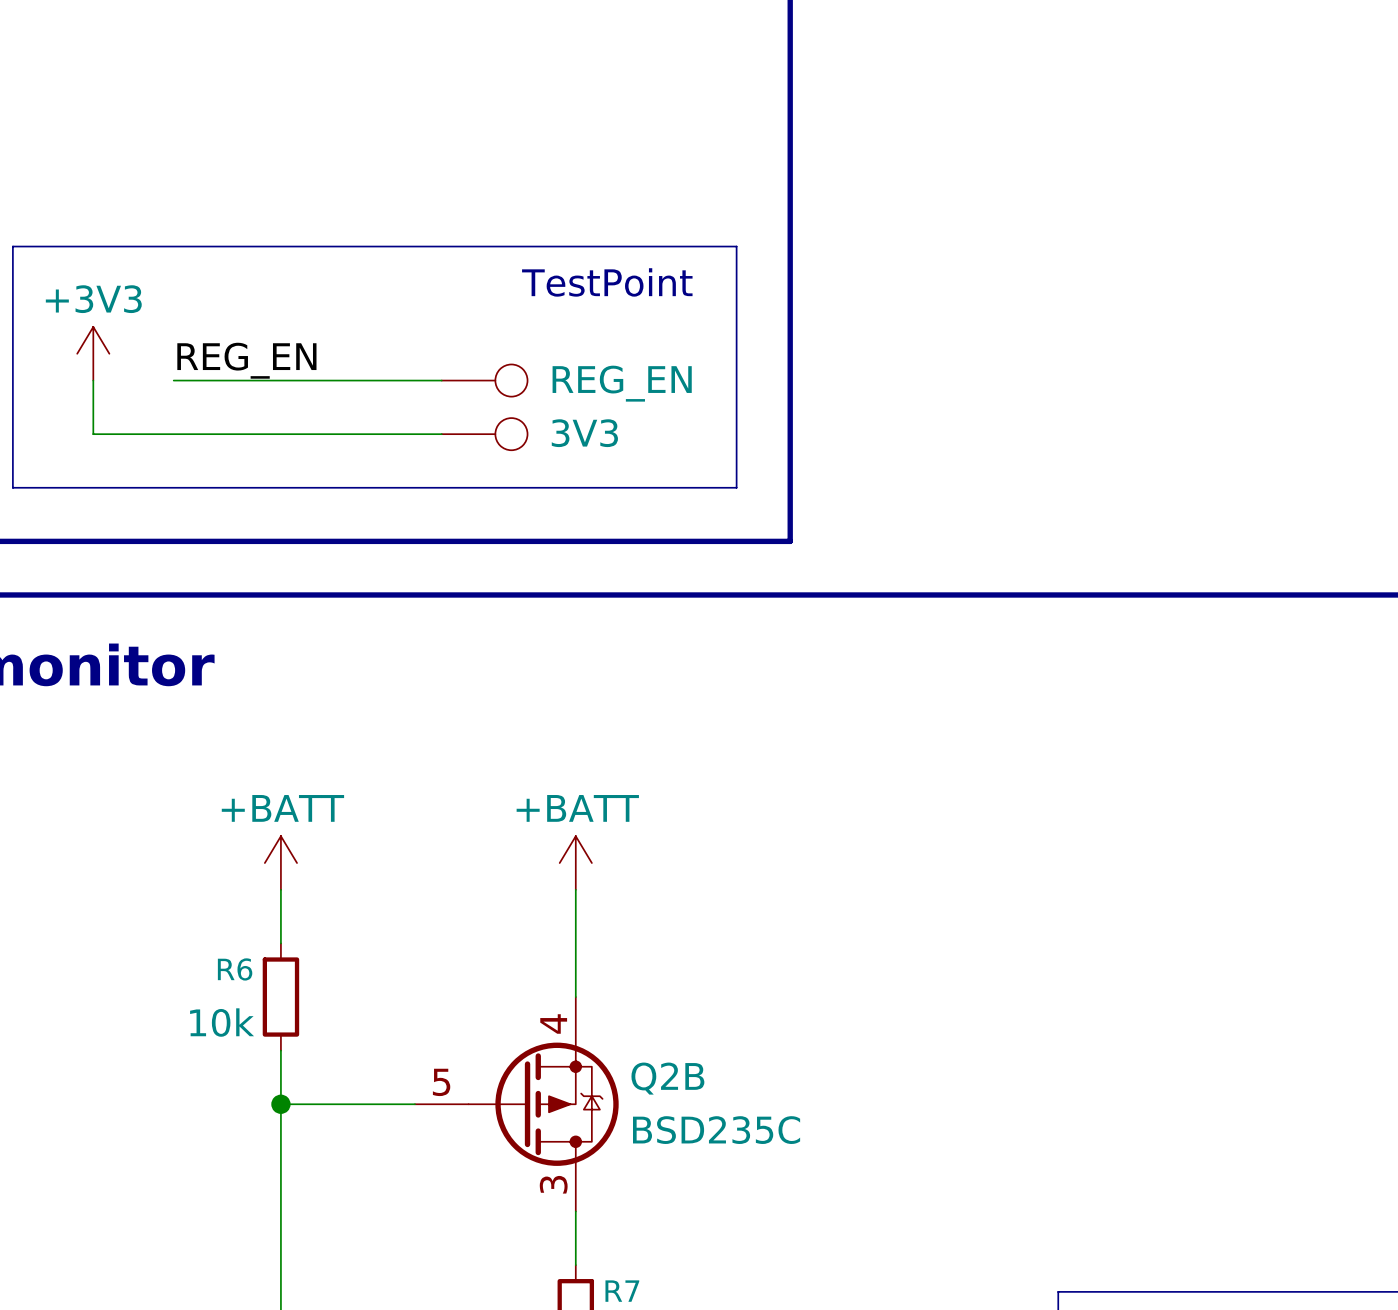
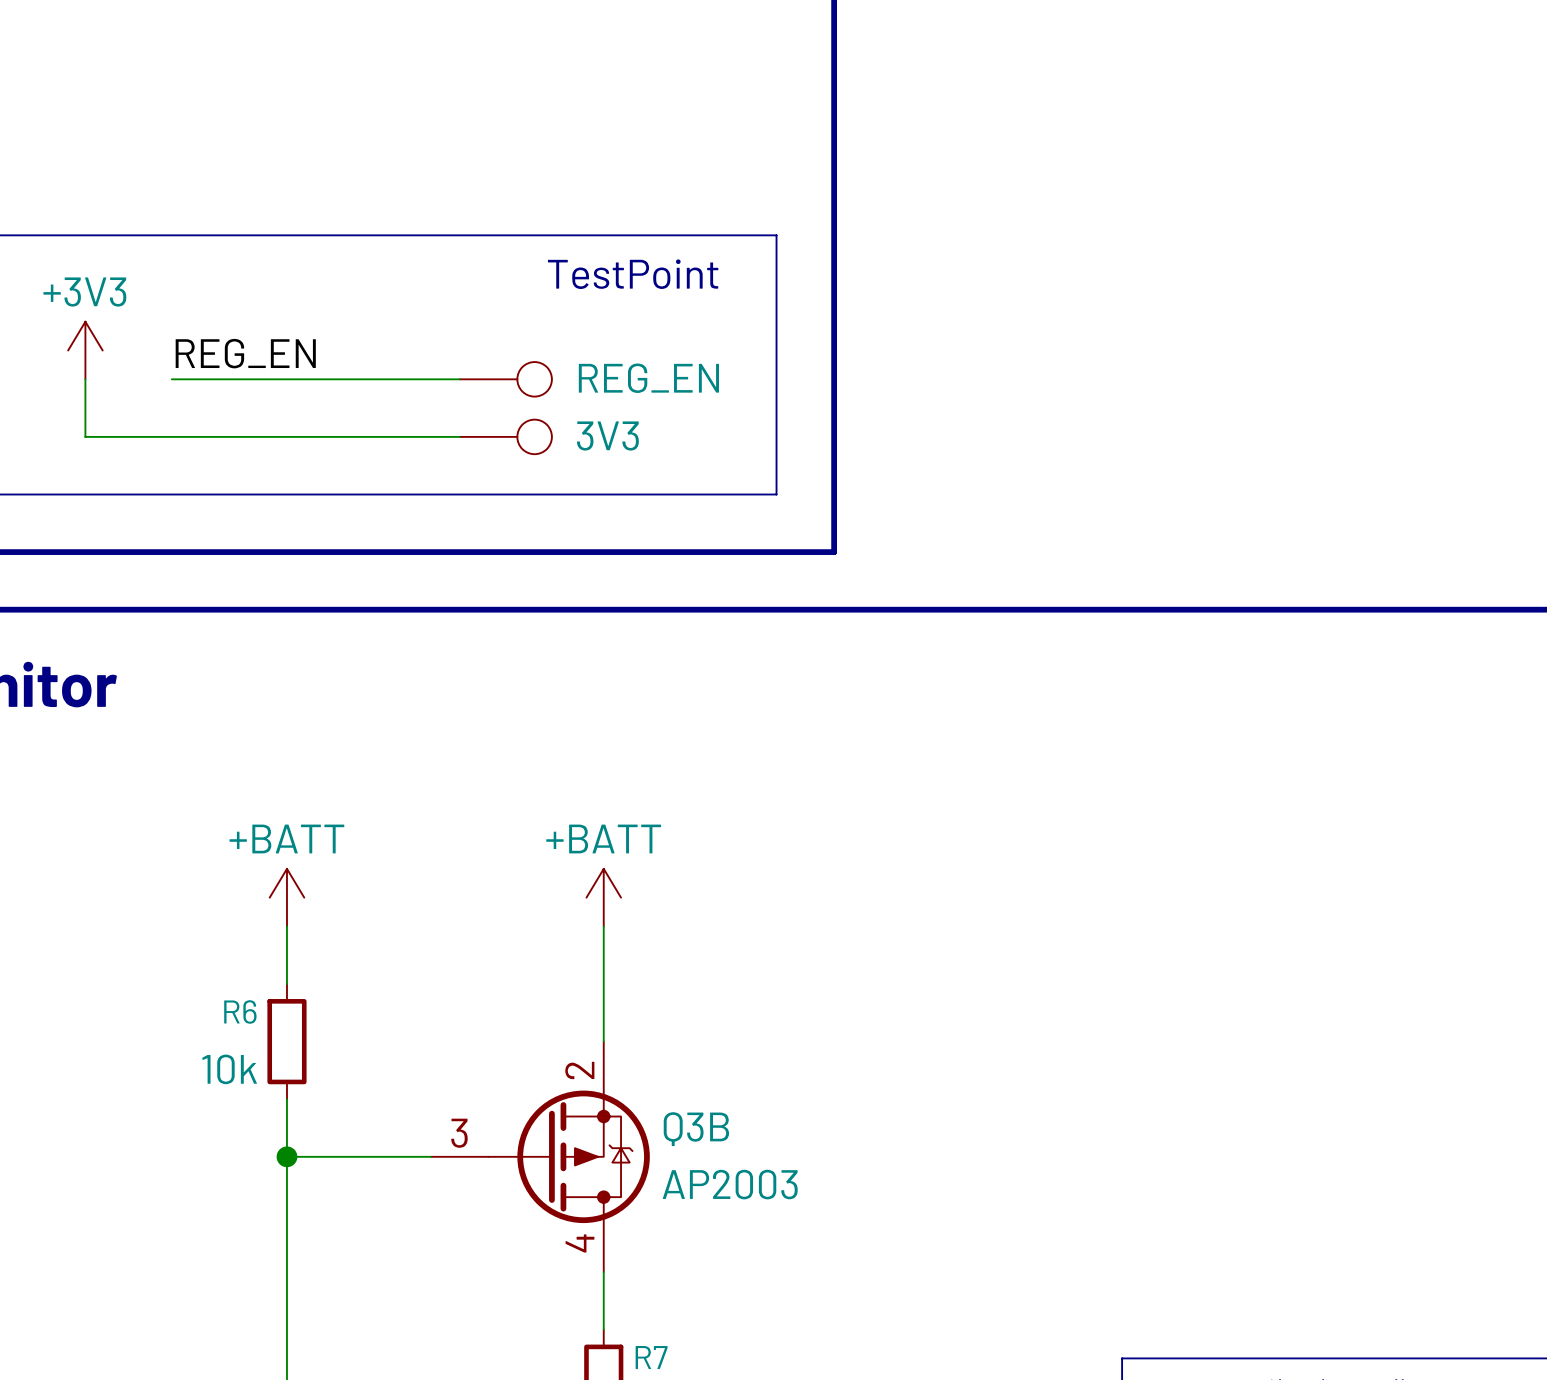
Q2B: BSD235C (516, 1104) -> none
Q3B: none -> AP2003 (540, 1156)

